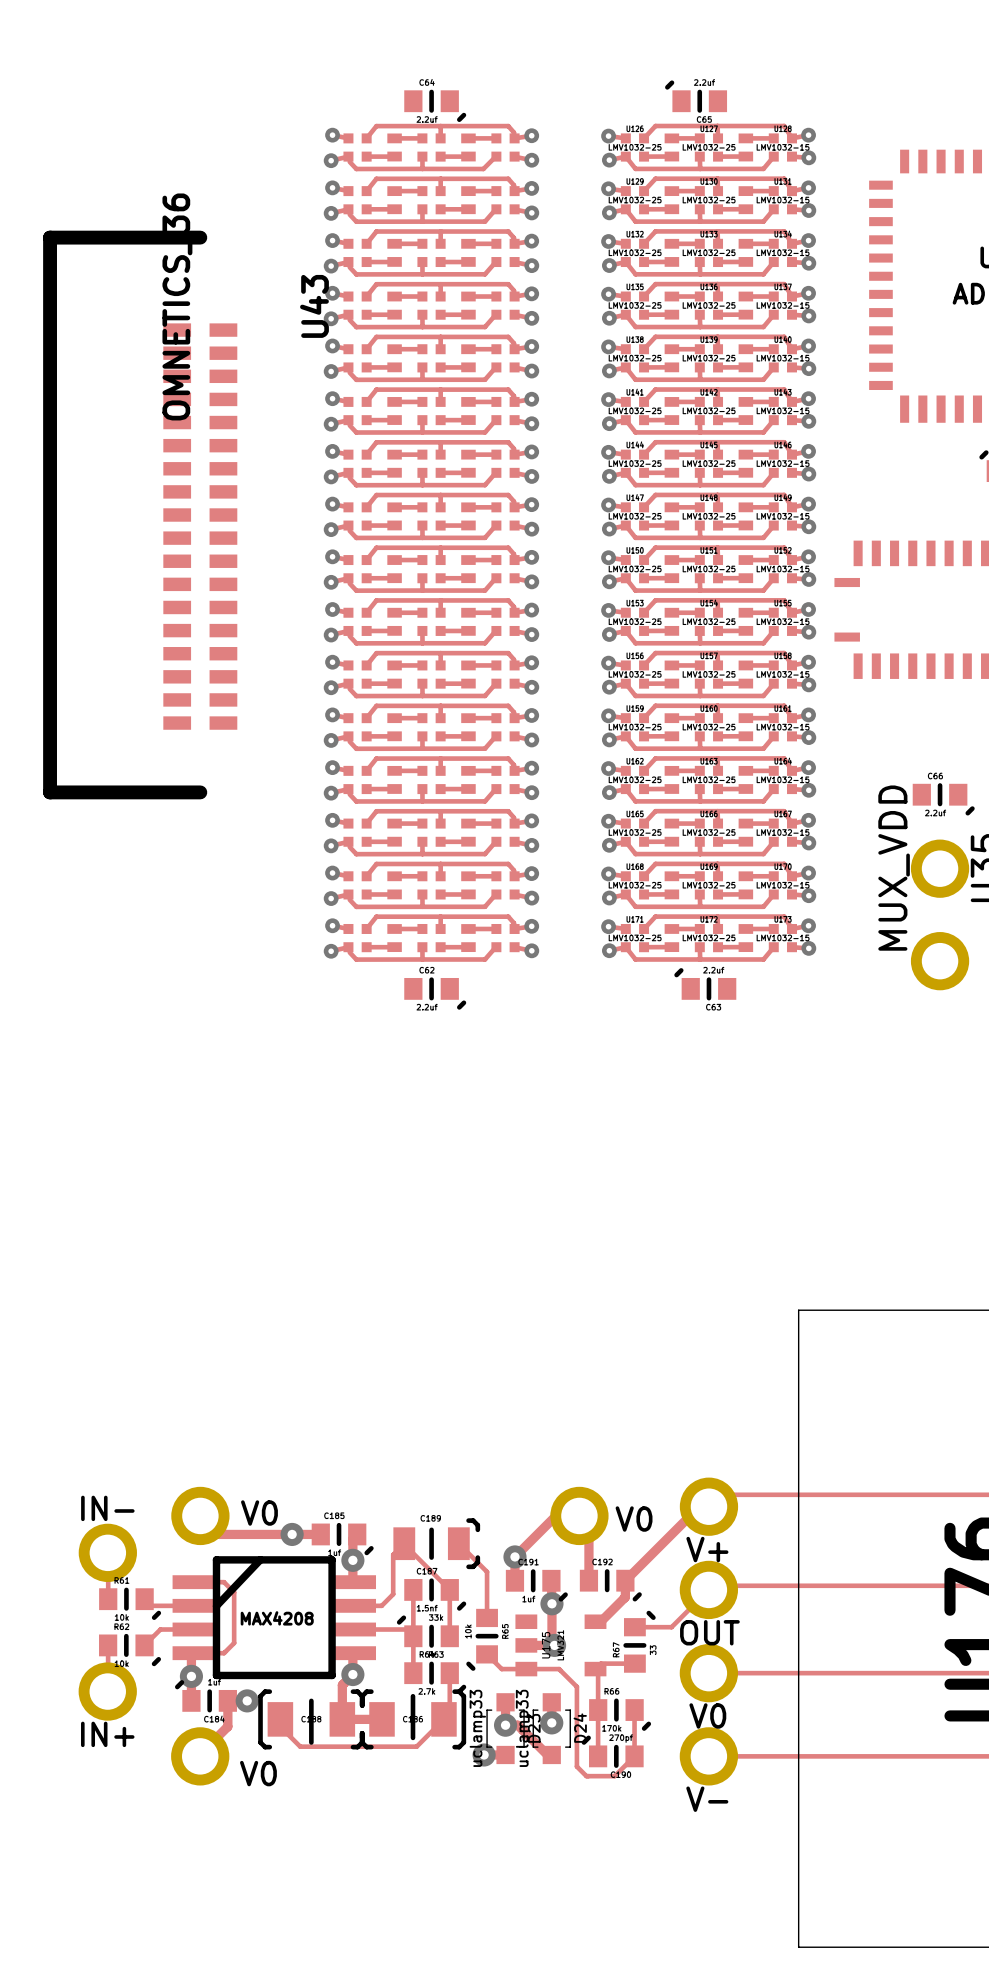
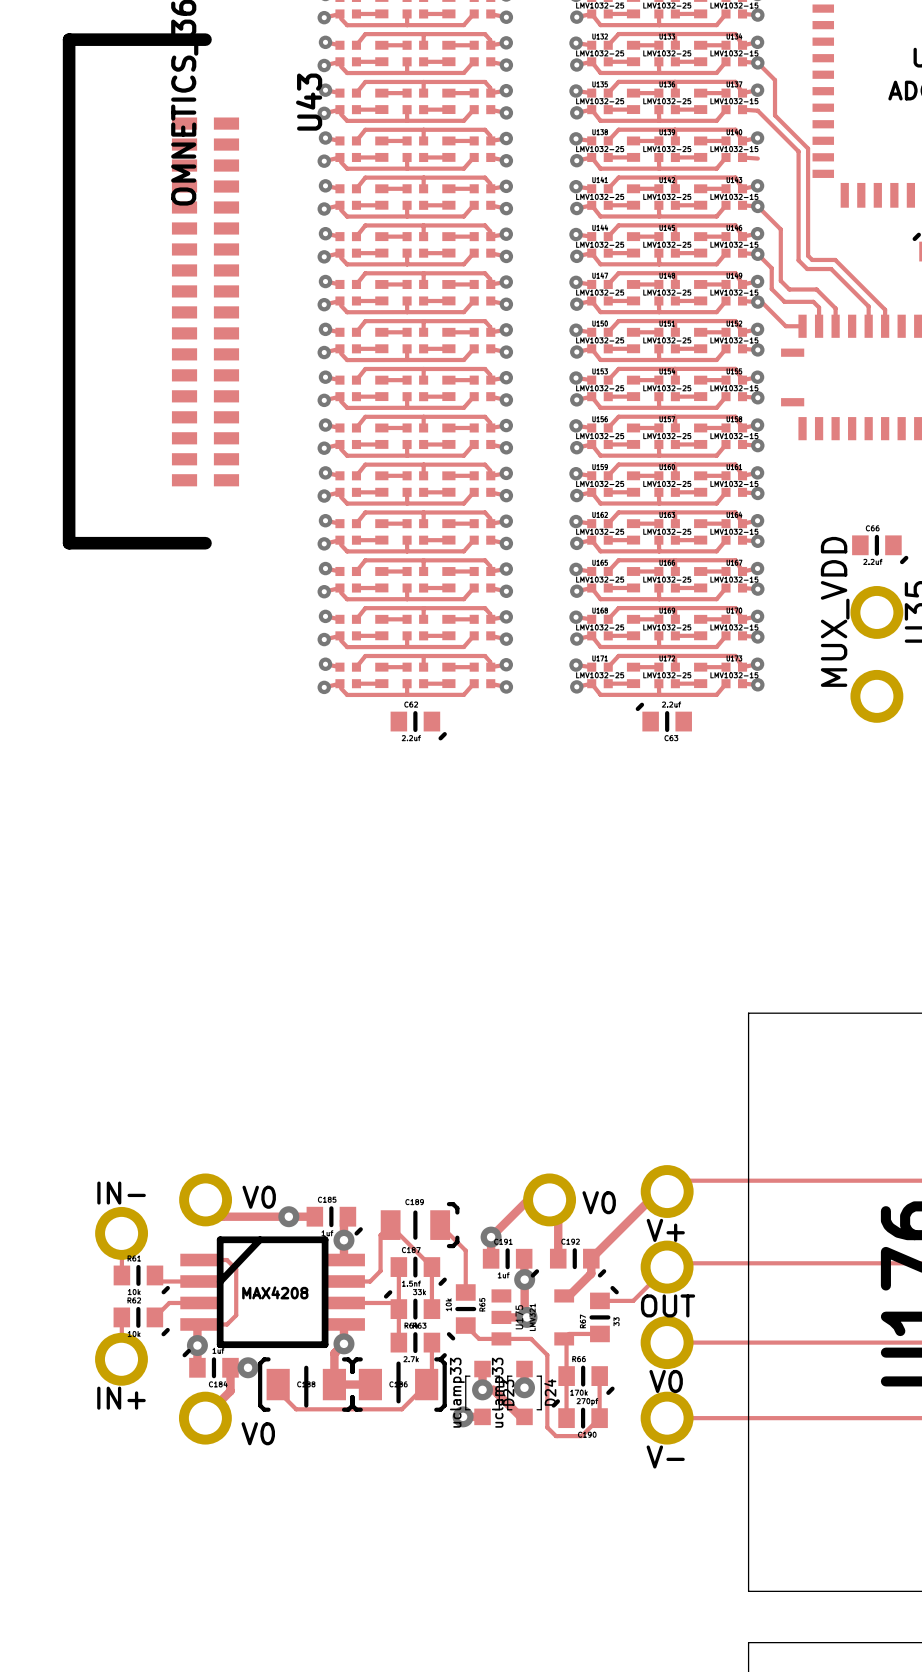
track: none -> (757, 62) (775, 80) (775, 115) (808, 148) (808, 255) (812, 259) (835, 259) (885, 309) (885, 326)
track: none -> (757, 110) (798, 151) (798, 260) (807, 269) (831, 269) (868, 306) (868, 326)
via: (808, 315) -> none
via: (808, 368) -> none
track: none -> (757, 206) (780, 229) (780, 280) (789, 289) (816, 289) (835, 308) (835, 326)
track: none -> (757, 254) (771, 268) (771, 289) (784, 301) (813, 301) (819, 307) (819, 326)
track: none -> (757, 302) (761, 302) (785, 326) (802, 326)

